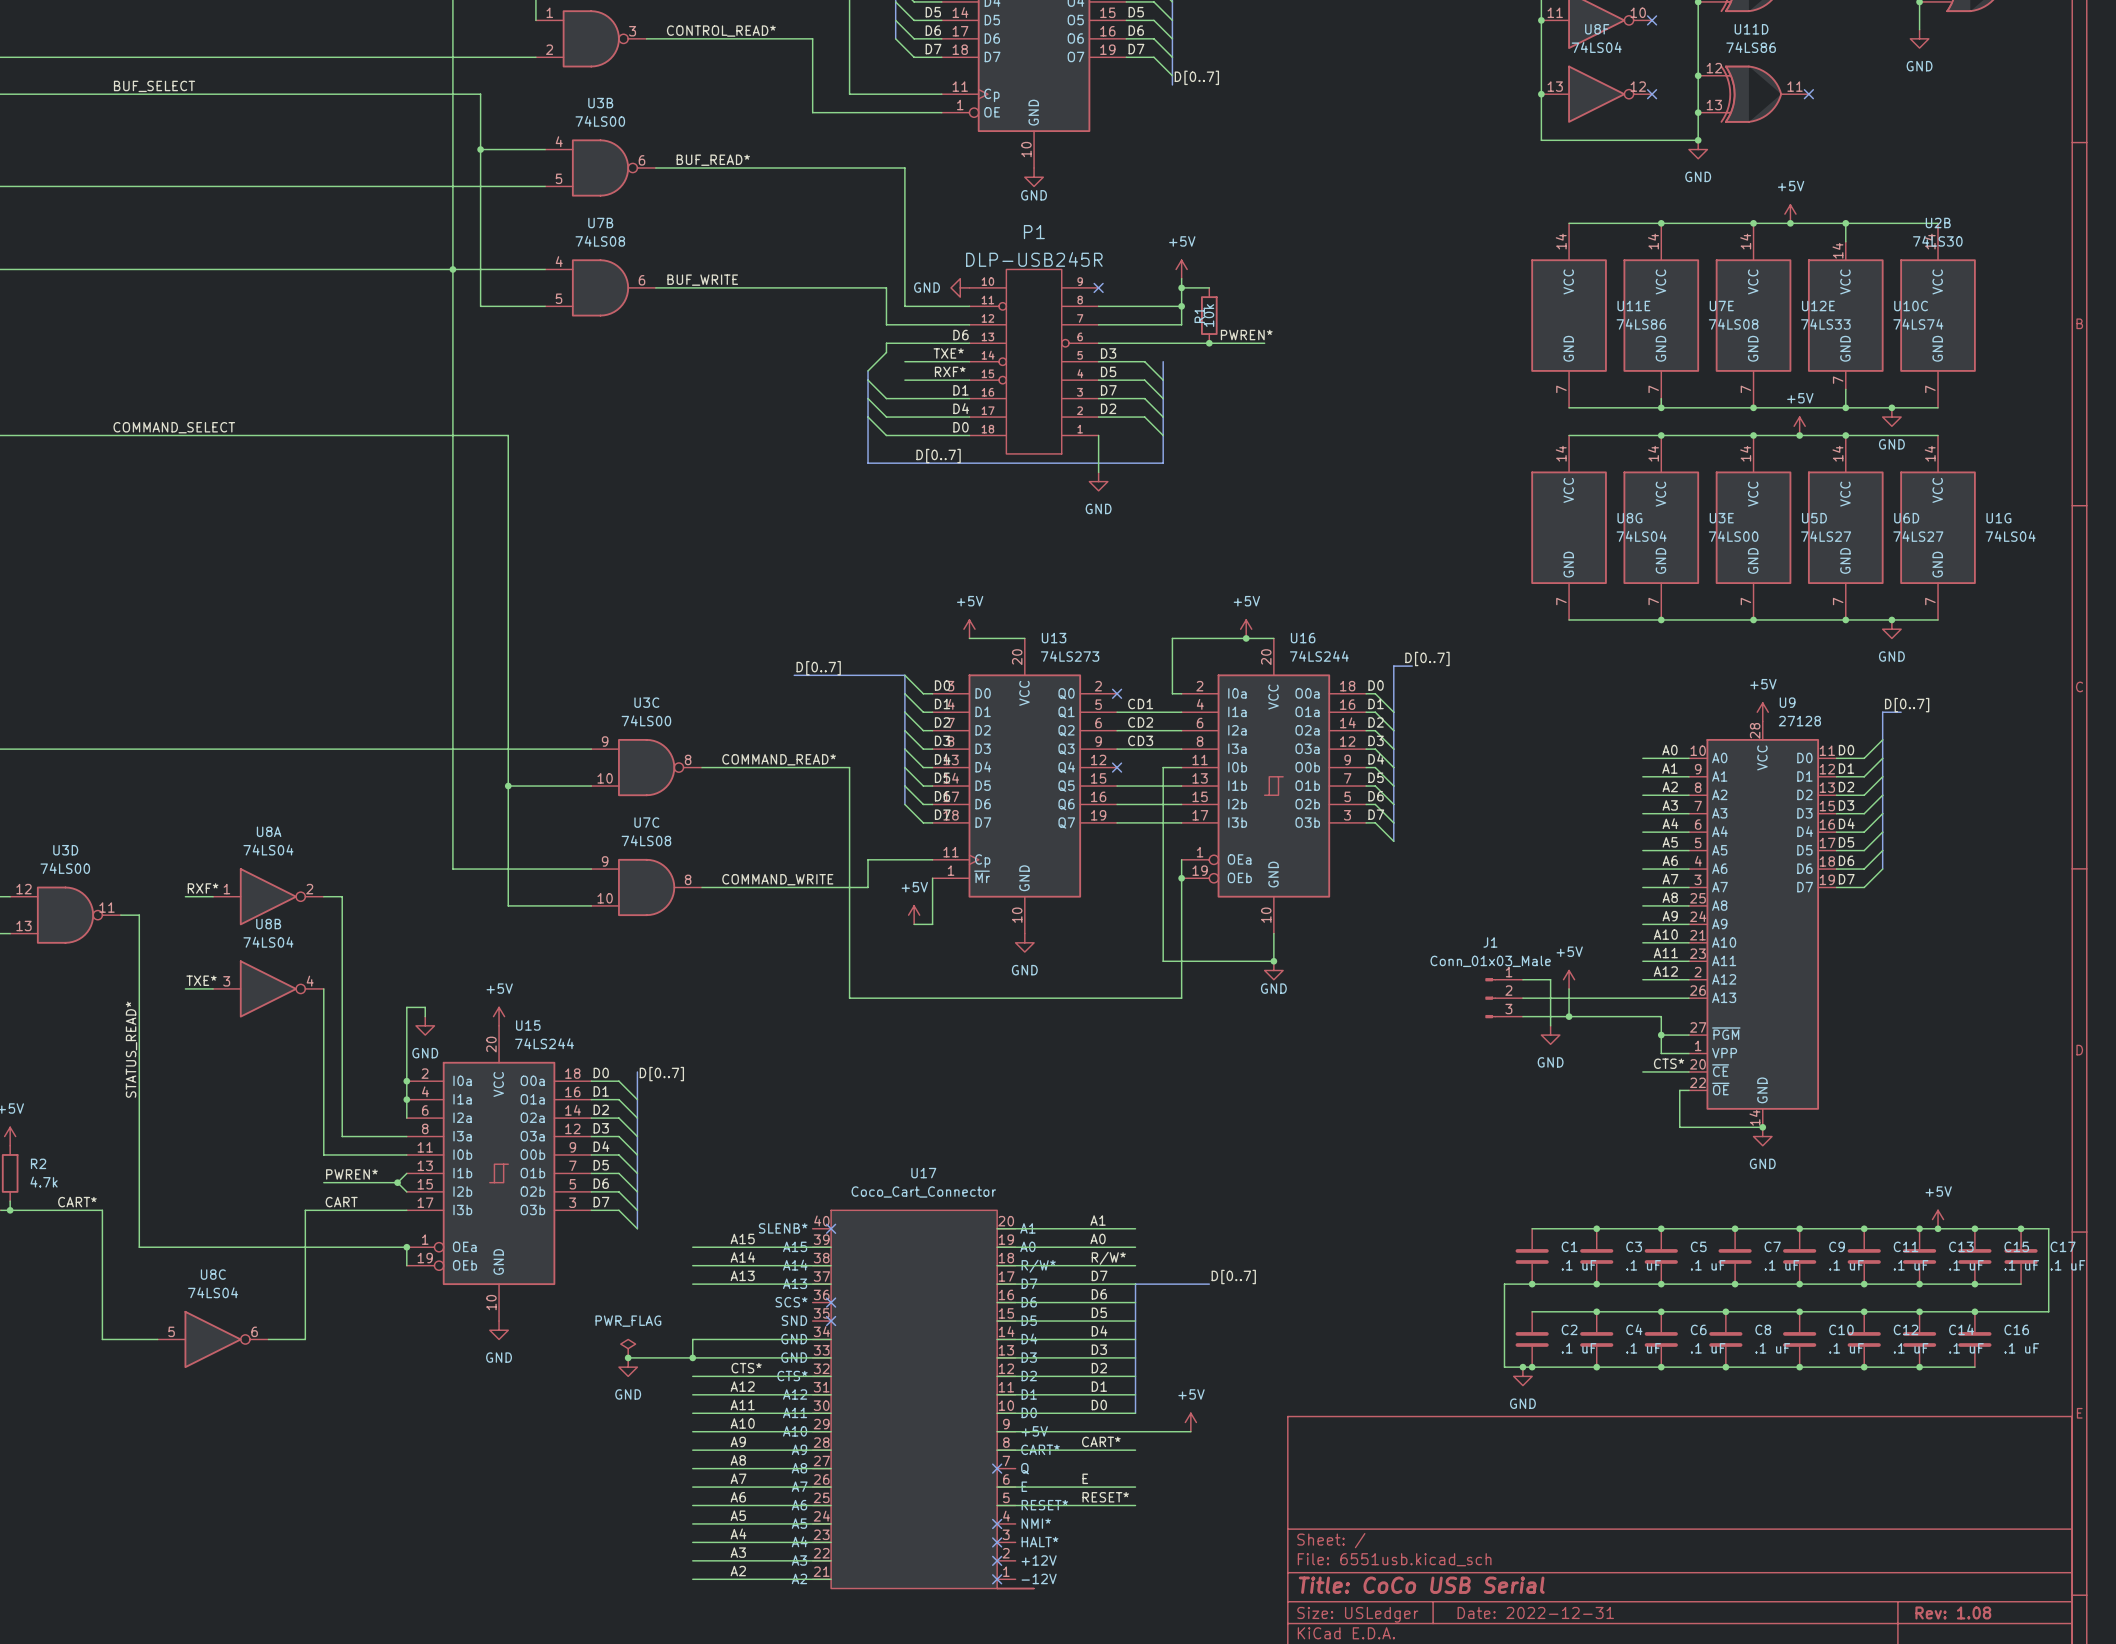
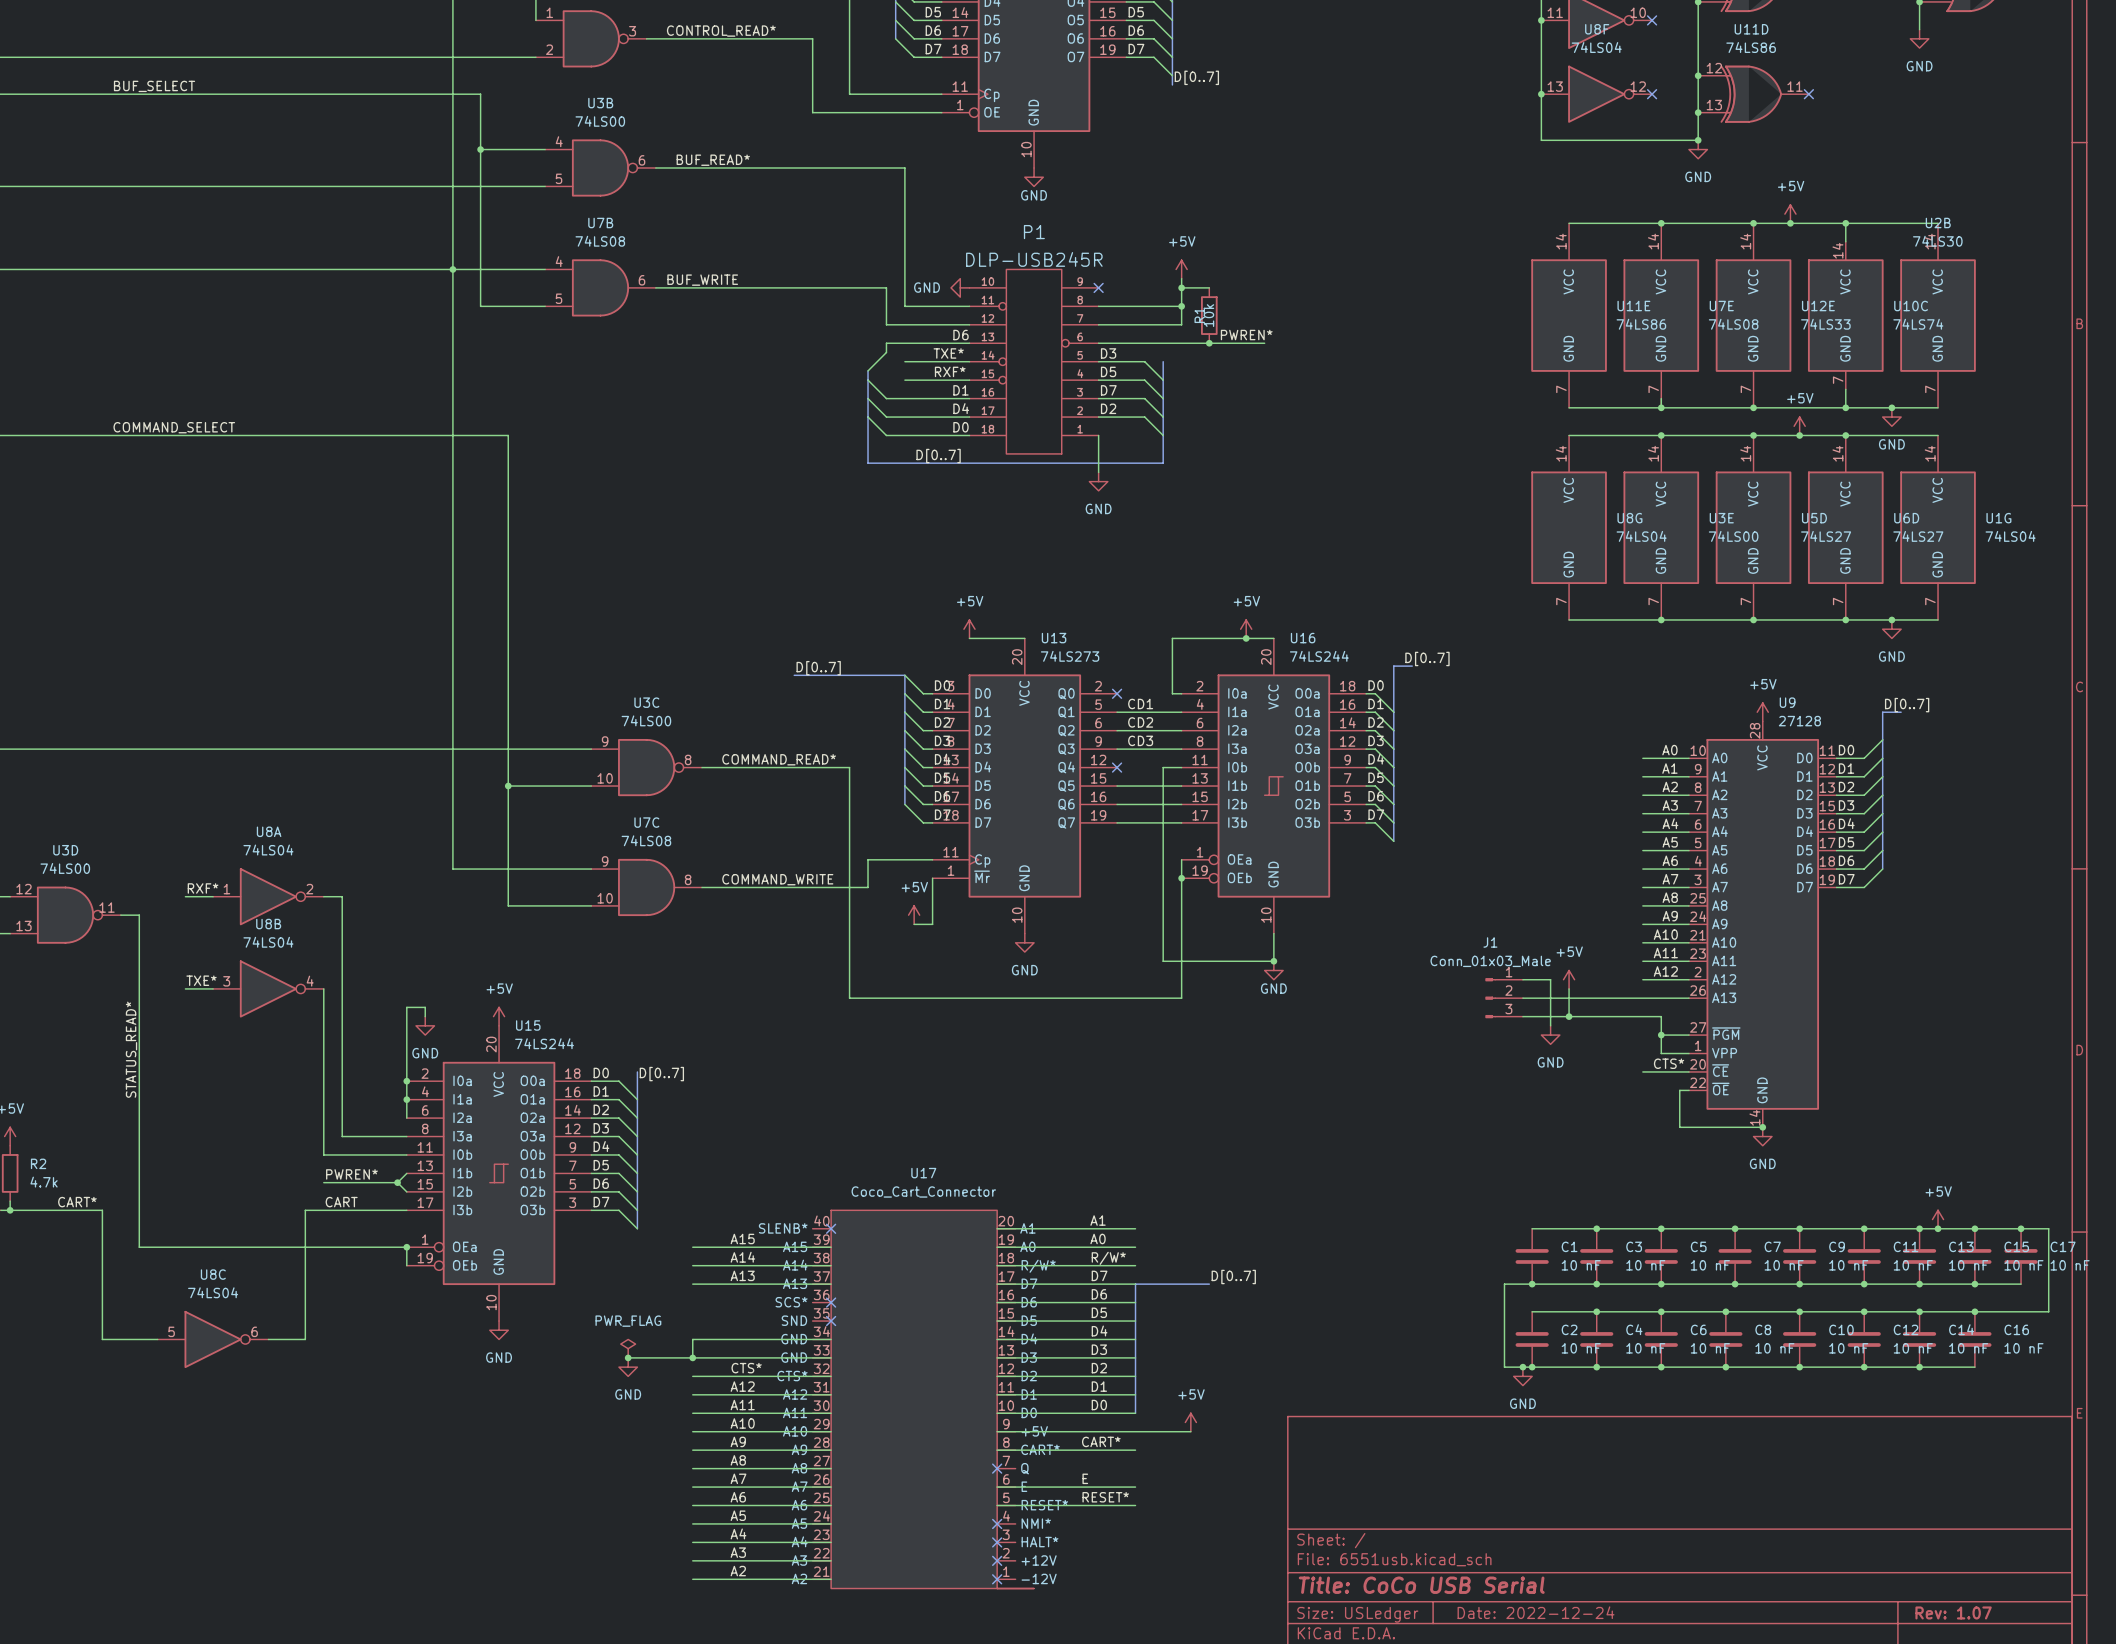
C1 value: .1 uF (1579, 1265) -> 10 nF (1581, 1265)
C3 value: .1 uF (1643, 1265) -> 10 nF (1645, 1265)
C5 value: .1 uF (1708, 1265) -> 10 nF (1710, 1265)
C7 value: .1 uF (1781, 1265) -> 10 nF (1784, 1265)
C9 value: .1 uF (1846, 1265) -> 10 nF (1848, 1265)
C11 value: .1 uF (1911, 1265) -> 10 nF (1913, 1265)
C13 value: .1 uF (1966, 1265) -> 10 nF (1968, 1265)
C15 value: .1 uF (2021, 1265) -> 10 nF (2023, 1265)
C17 value: .1 uF (2067, 1265) -> 10 nF (2070, 1265)
C2 value: .1 uF (1579, 1348) -> 10 nF (1581, 1348)
C4 value: .1 uF (1643, 1348) -> 10 nF (1645, 1348)
C6 value: .1 uF (1708, 1348) -> 10 nF (1710, 1348)
C8 value: .1 uF (1772, 1348) -> 10 nF (1774, 1348)
C10 value: .1 uF (1846, 1348) -> 10 nF (1848, 1348)
C12 value: .1 uF (1911, 1348) -> 10 nF (1913, 1348)
C14 value: .1 uF (1966, 1348) -> 10 nF (1968, 1348)
C16 value: .1 uF (2021, 1348) -> 10 nF (2023, 1348)
title block: Date: 2022-12-31 (1535, 1612) -> Date: 2022-12-24 (1536, 1612)
title block: Rev: 1.08 (1953, 1612) -> Rev: 1.07 (1953, 1612)

